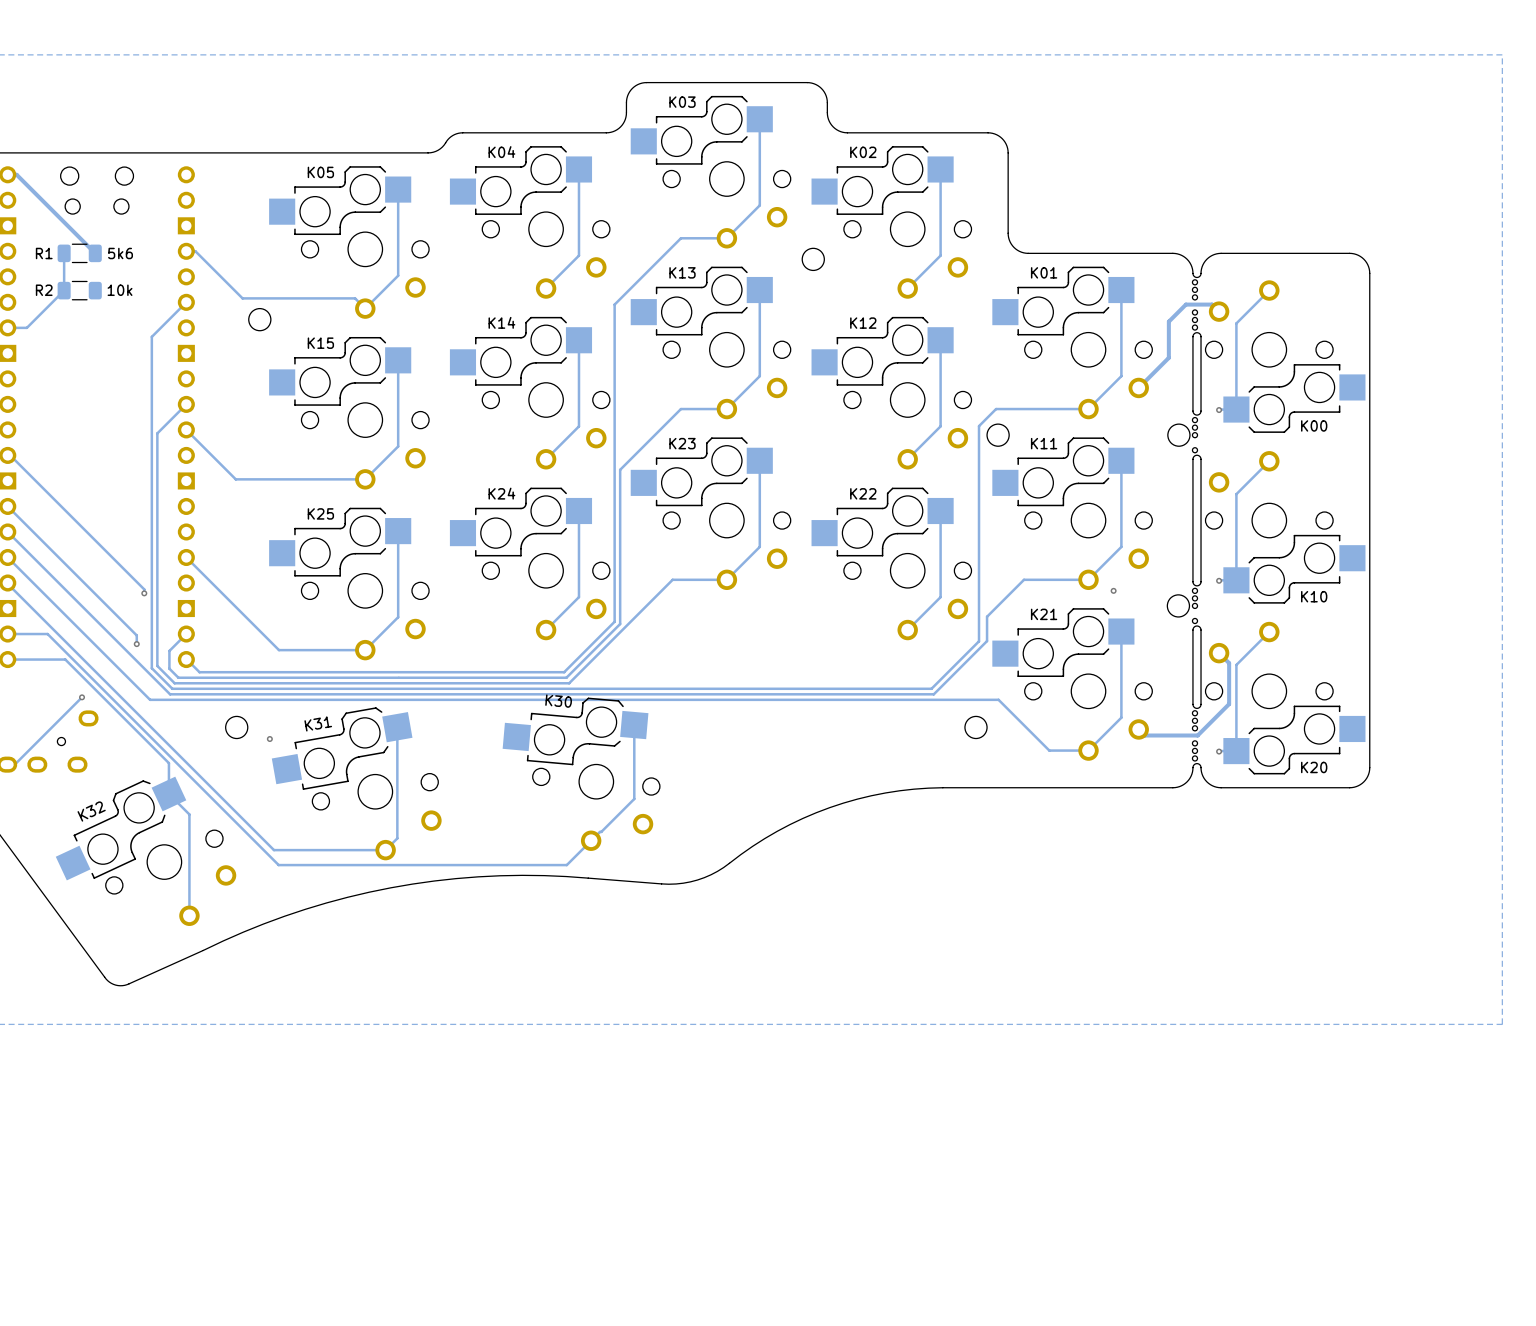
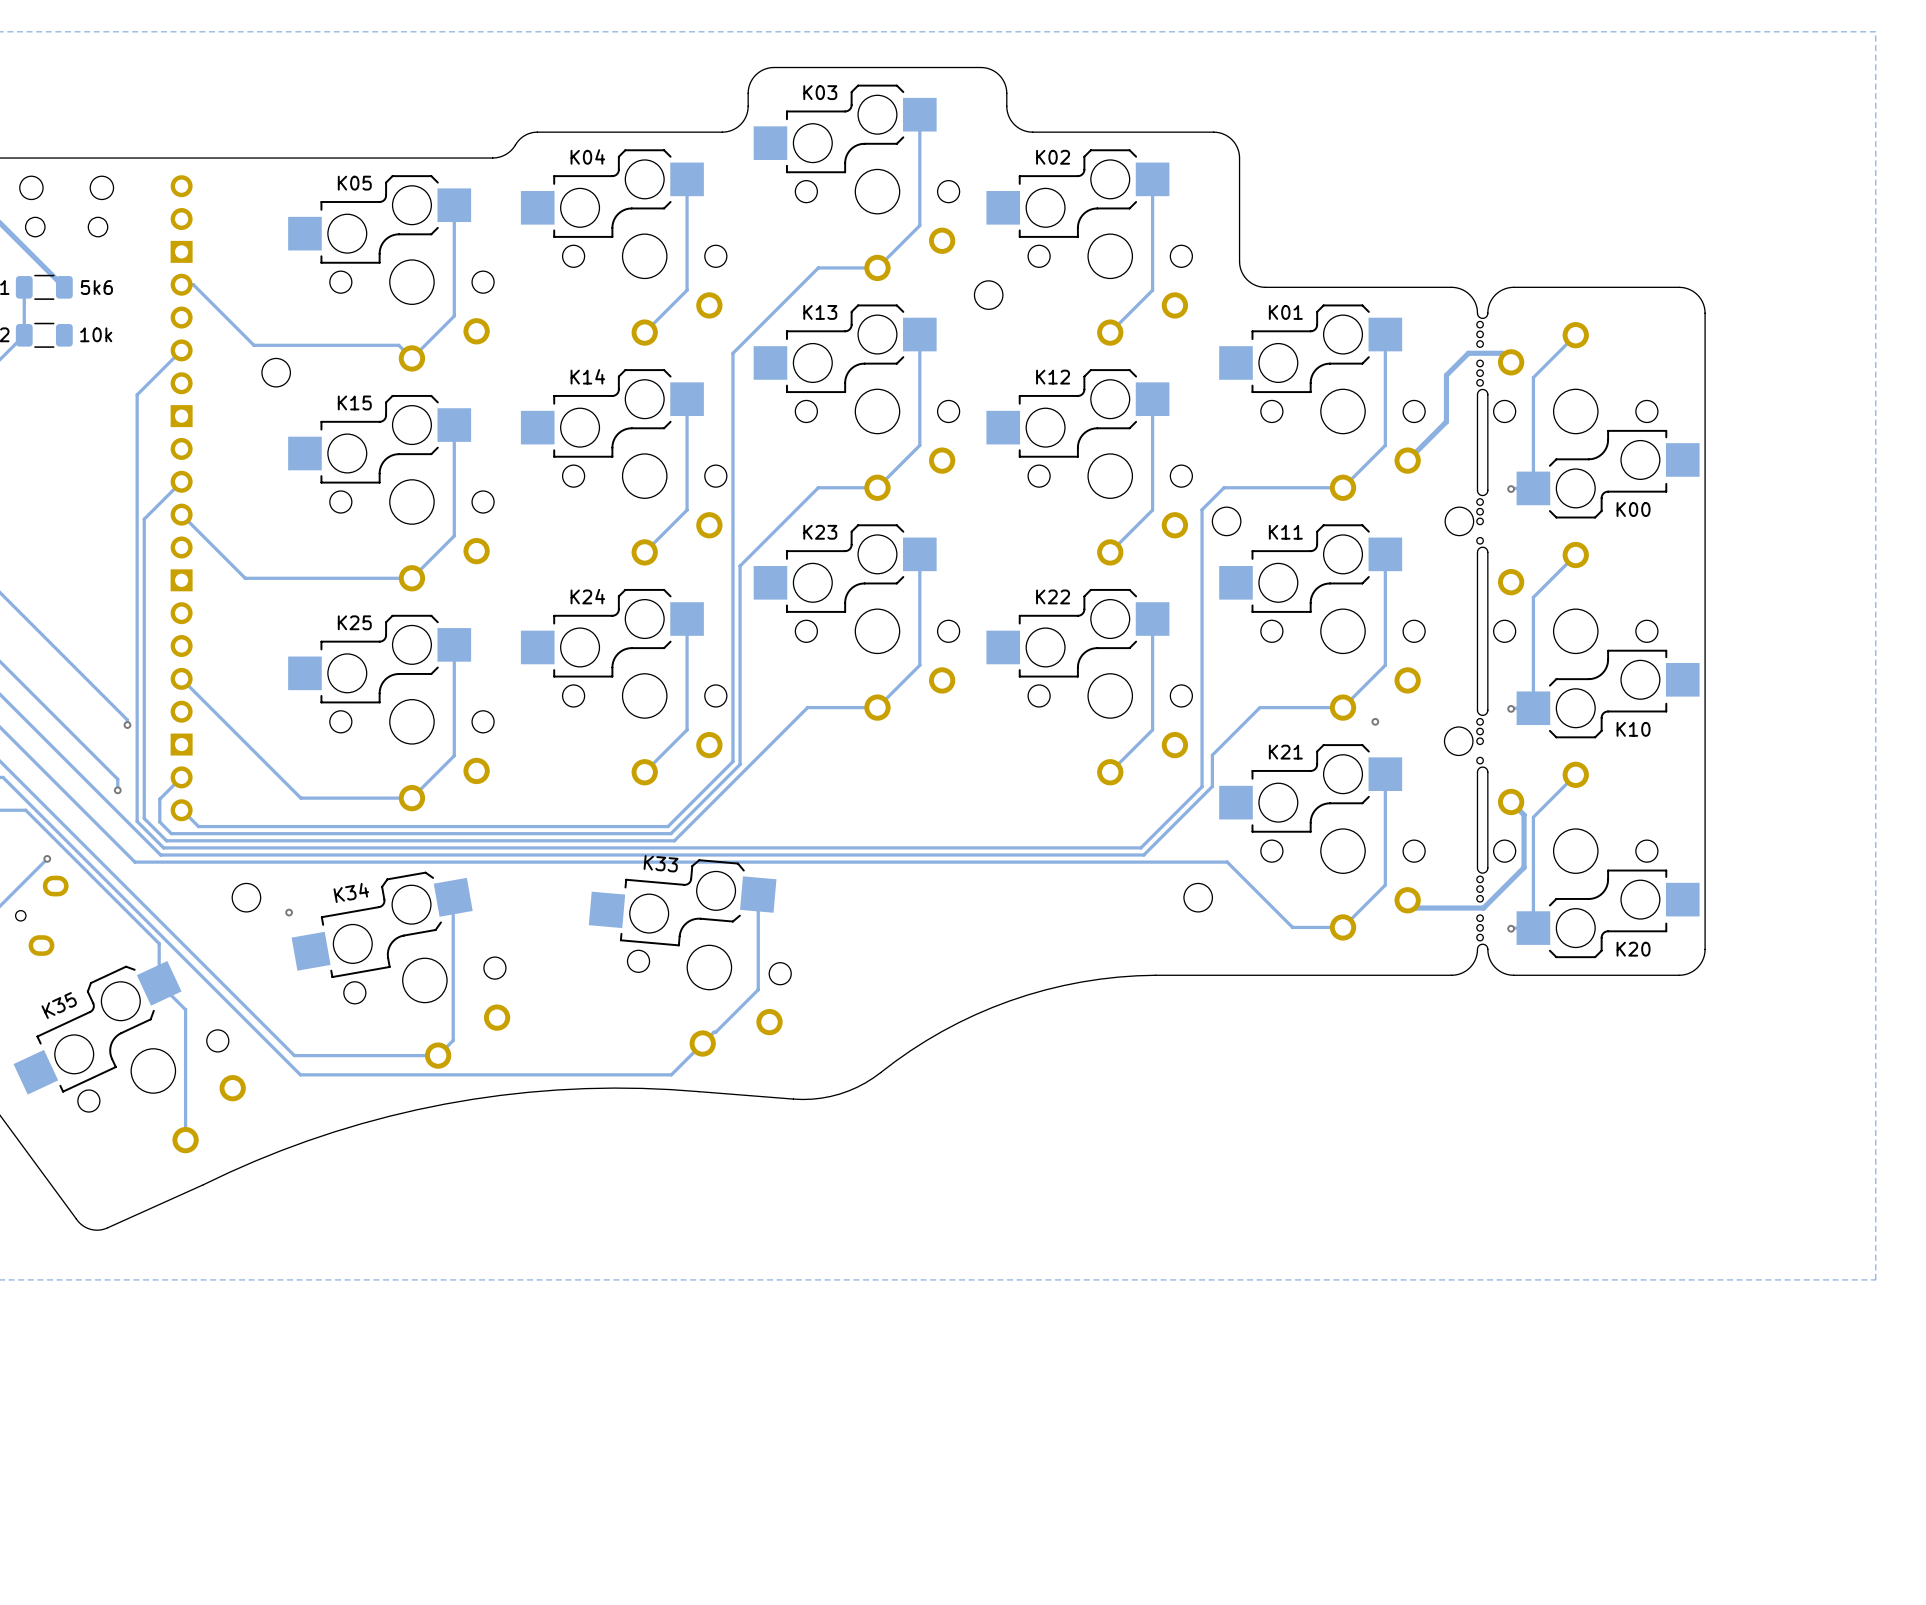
K30 name: K30 (558, 701) -> K33 (661, 863)
K31 name: K31 (318, 723) -> K34 (351, 892)
K32 name: K32 (91, 811) -> K35 (59, 1005)

